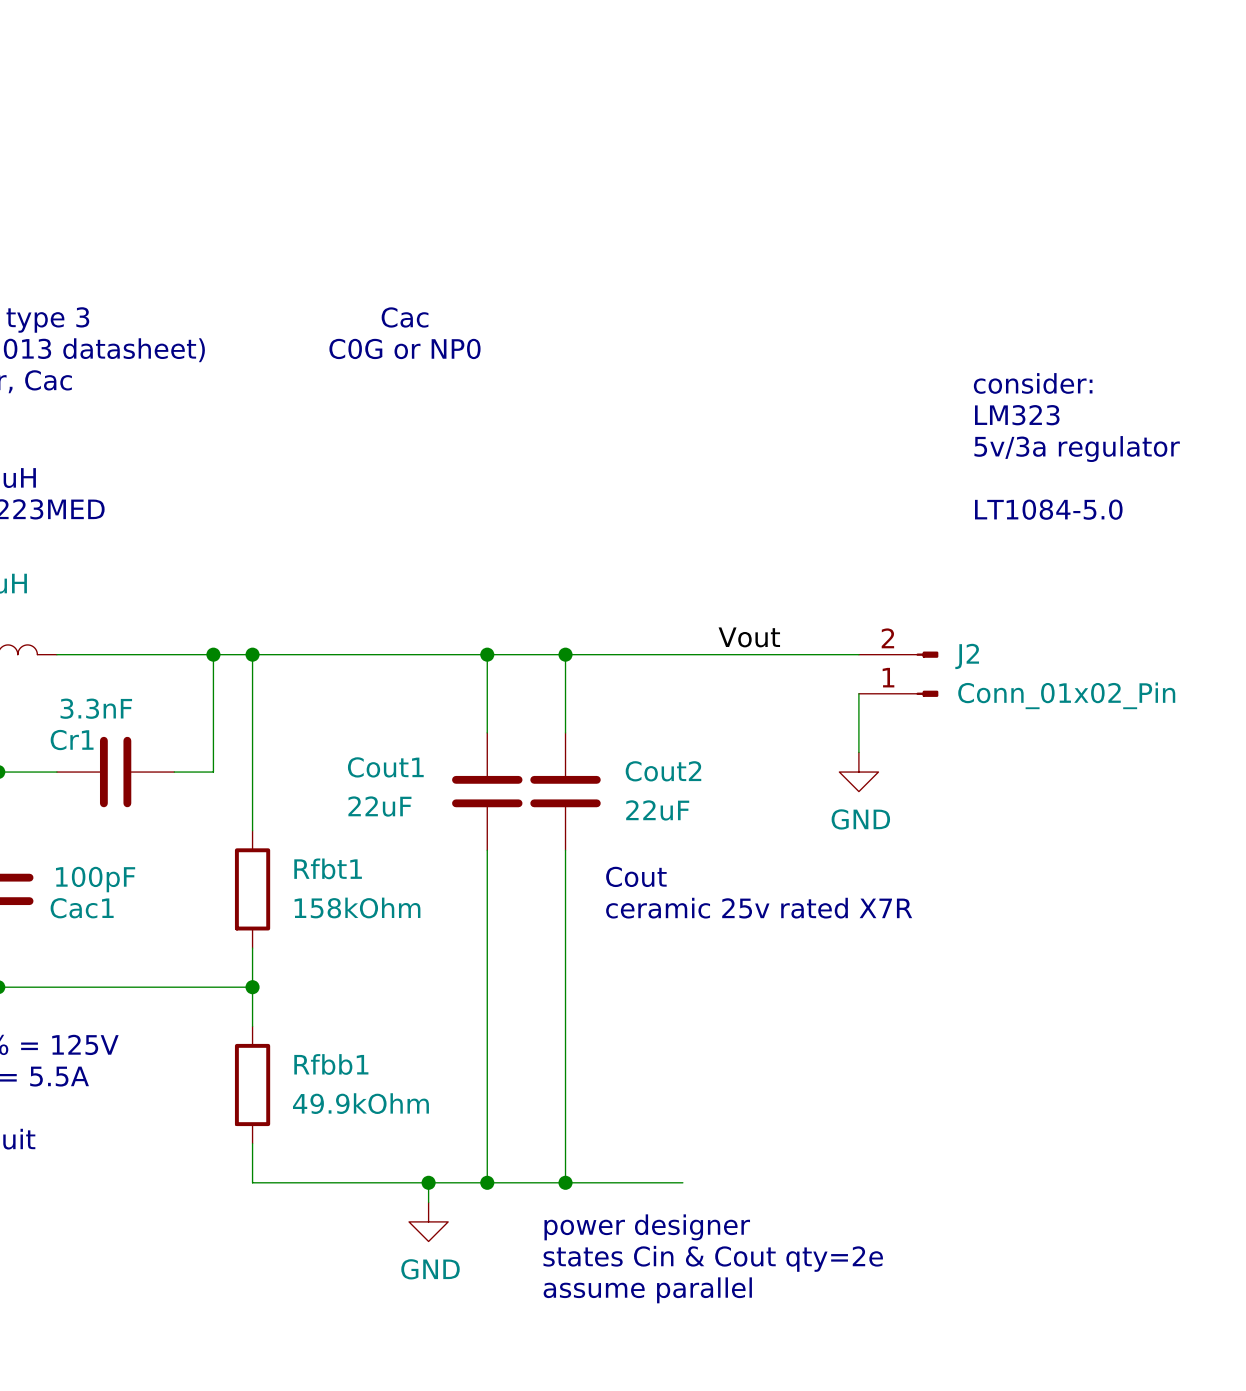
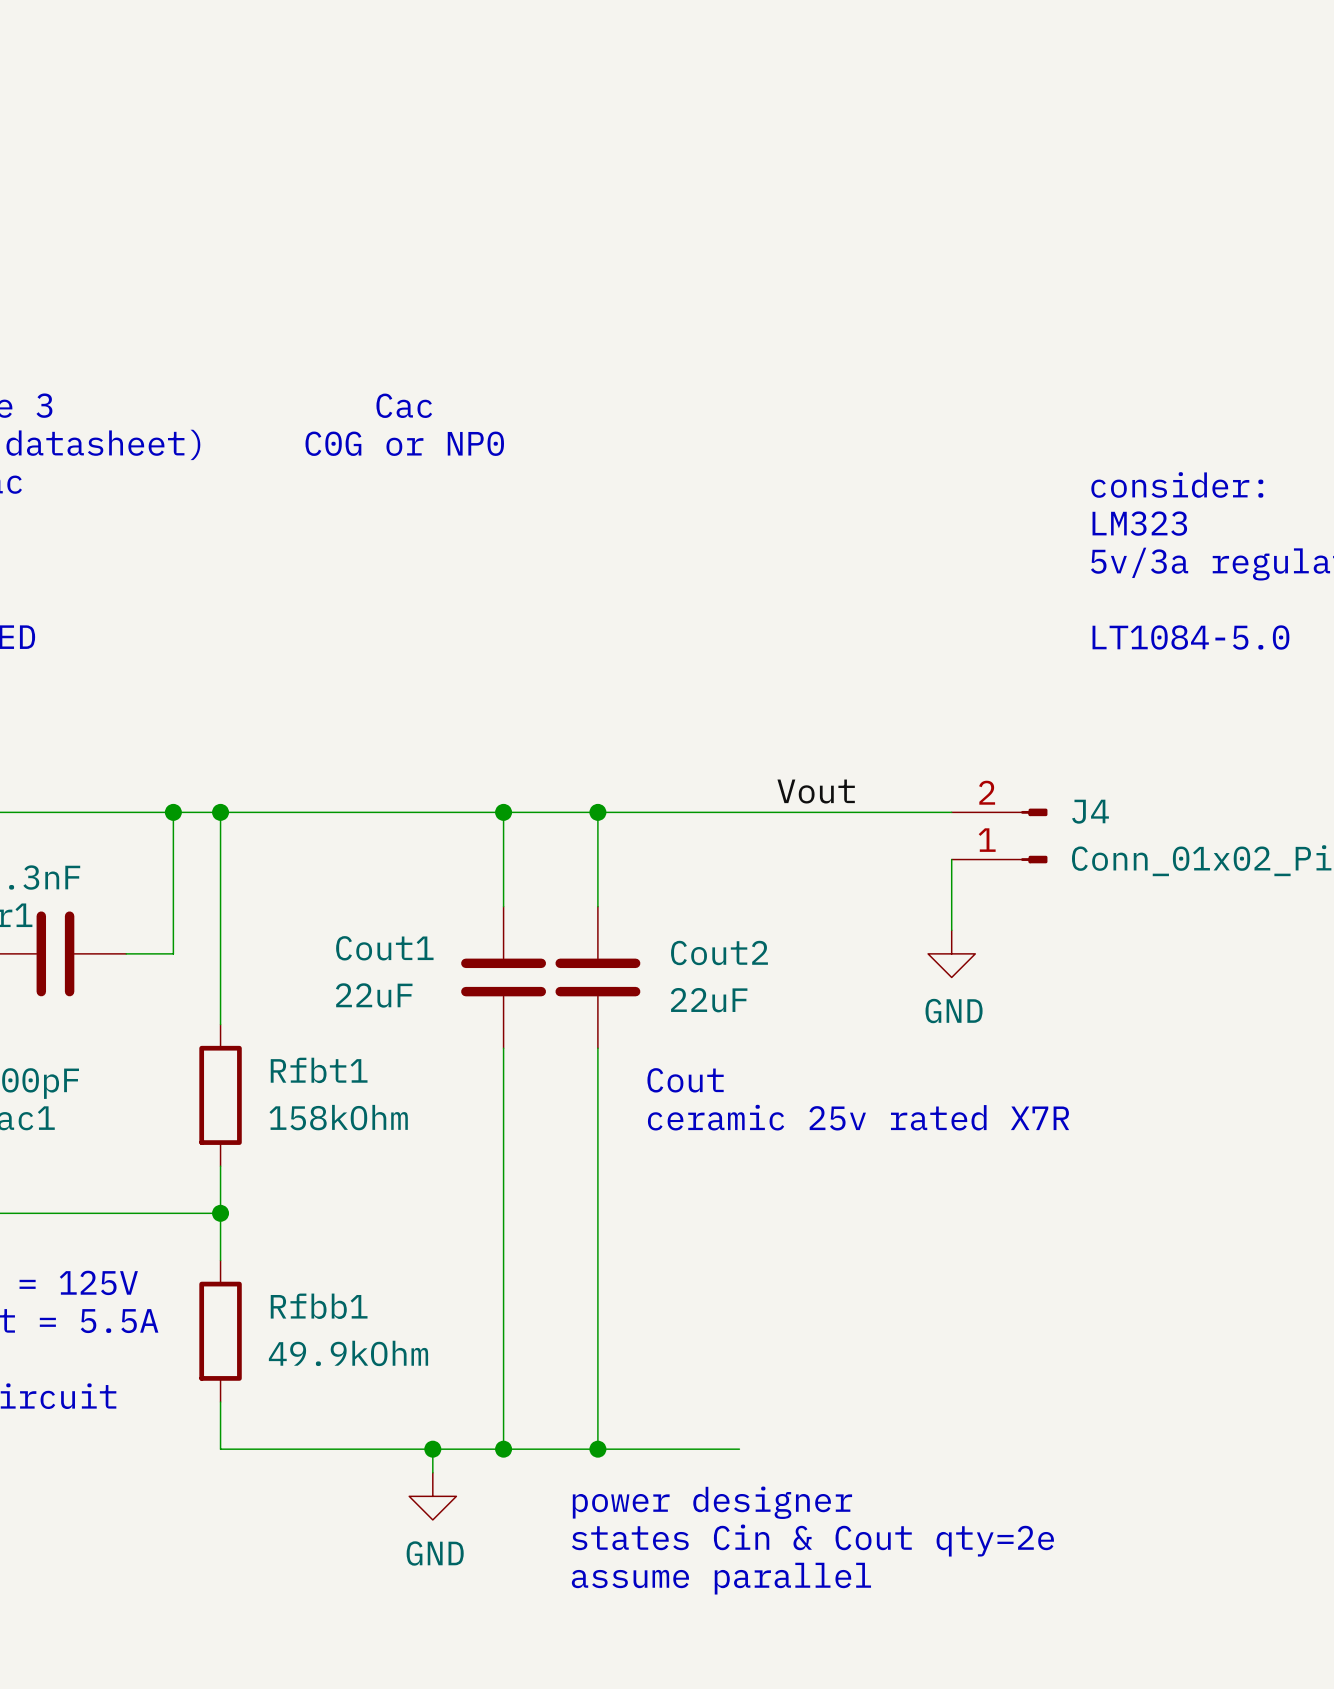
J2 name: J2 (967, 656) -> J4 (1090, 811)

